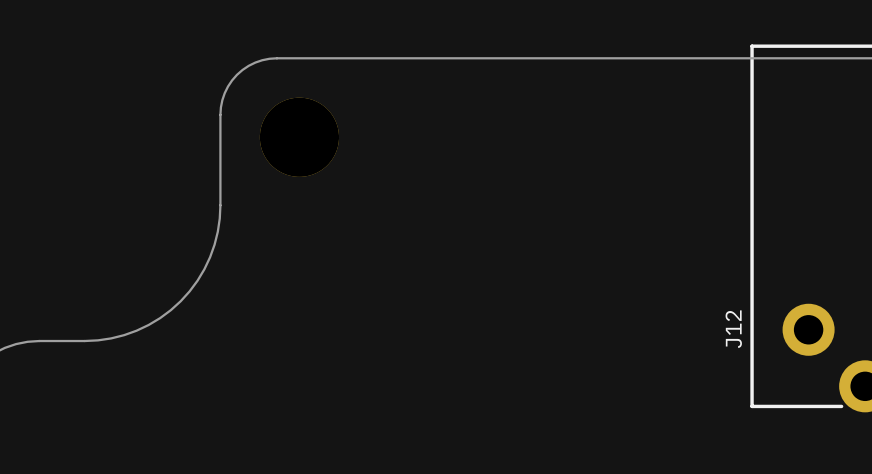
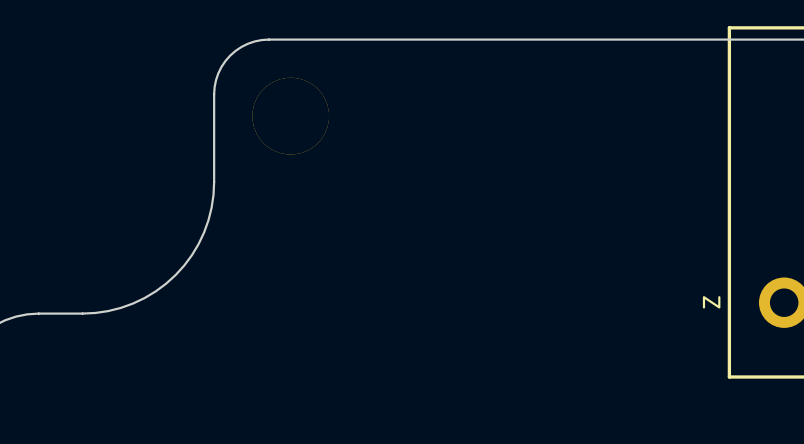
J12 name: J12 (733, 329) -> Z (711, 302)

